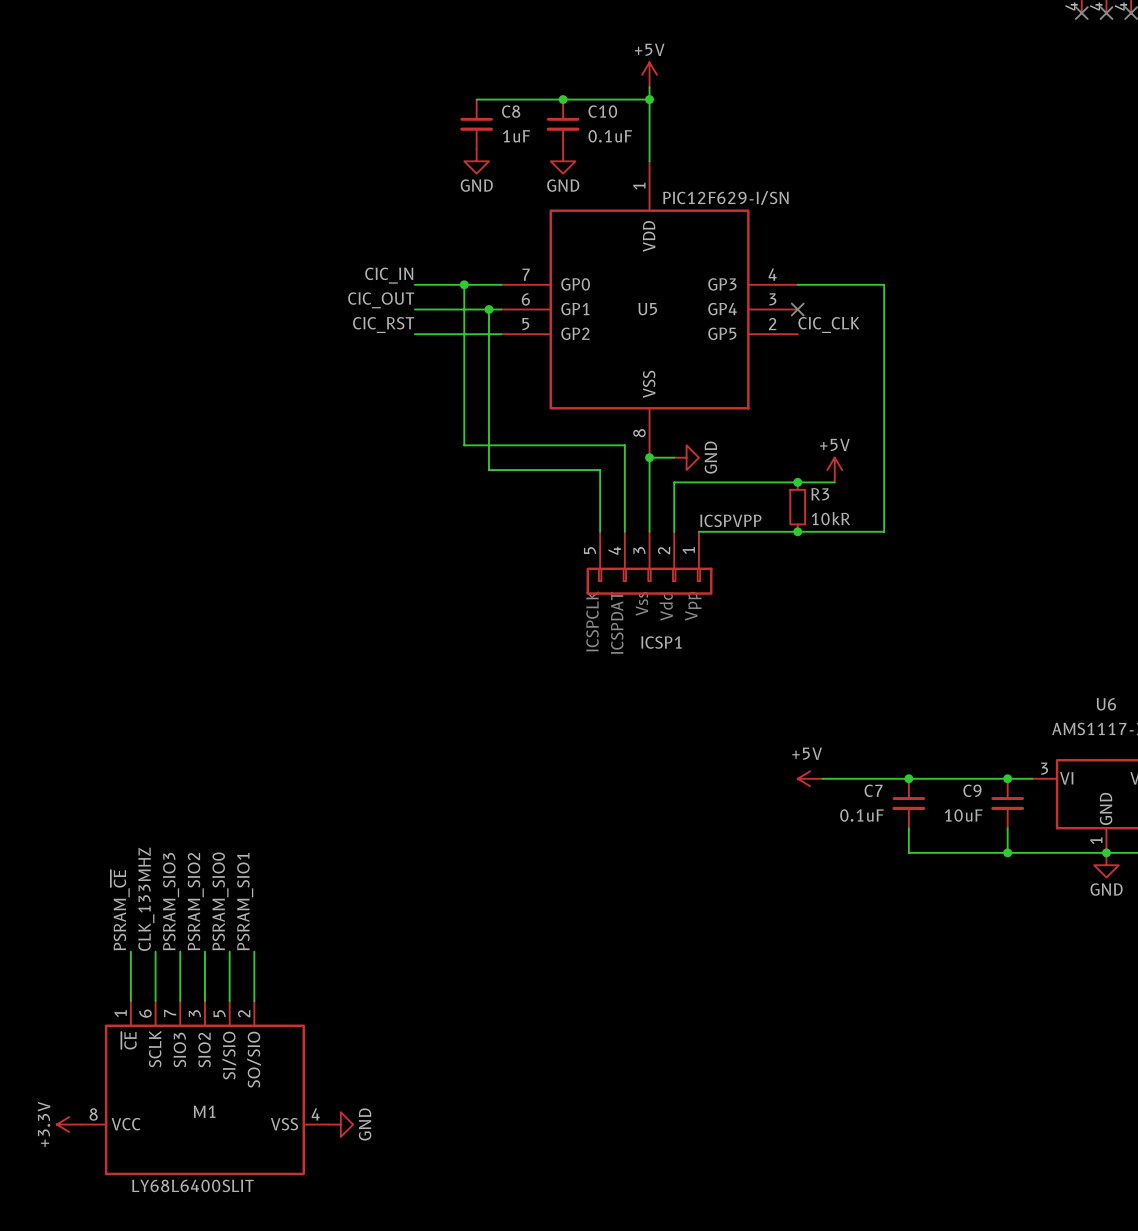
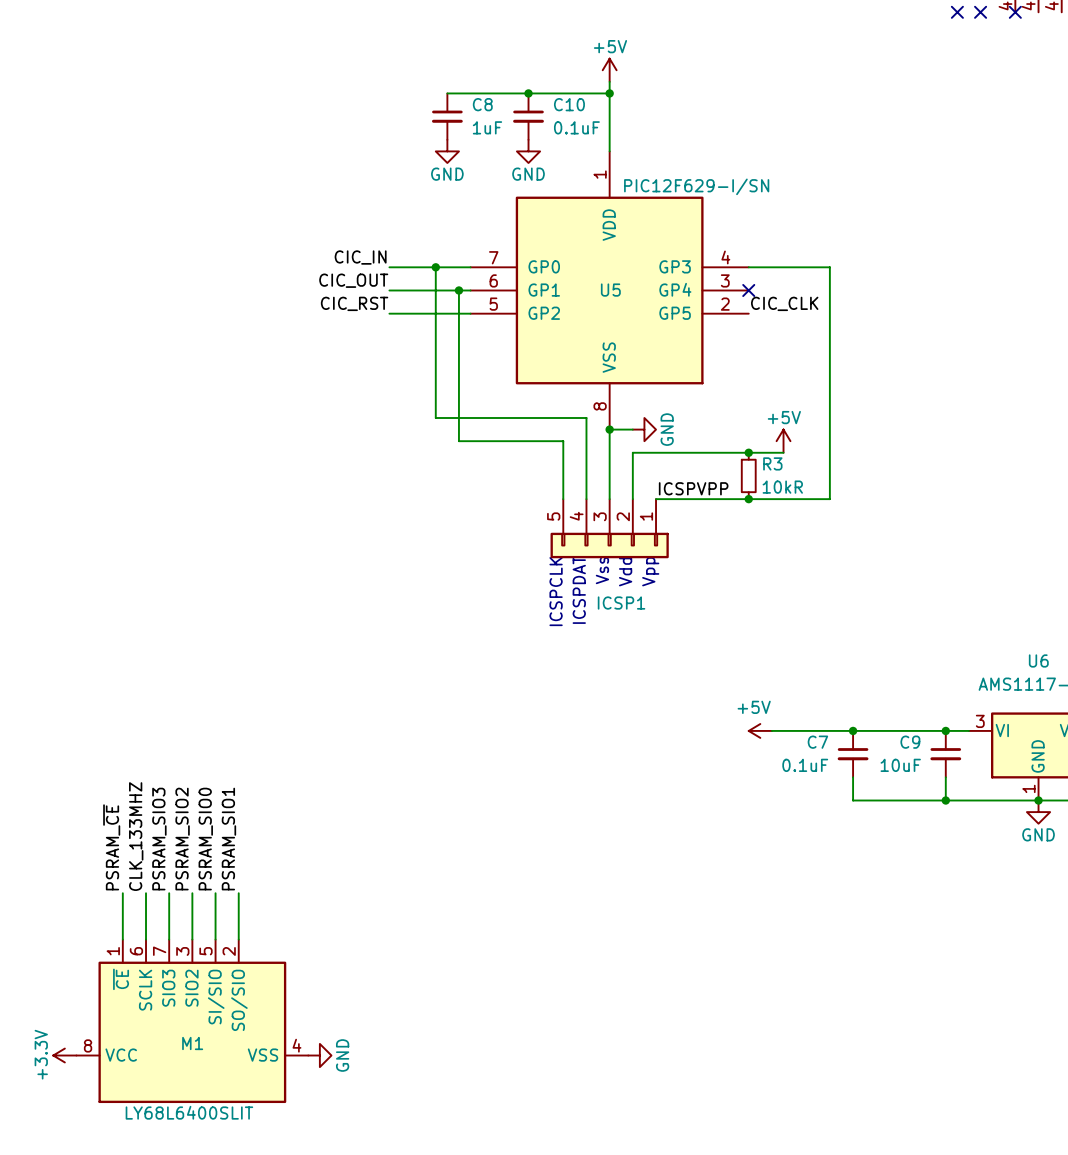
no-connect mark: none -> (957, 12)
no-connect mark: none -> (980, 12)
no-connect mark: (1106, 13) -> none
no-connect mark: (1131, 13) -> none

